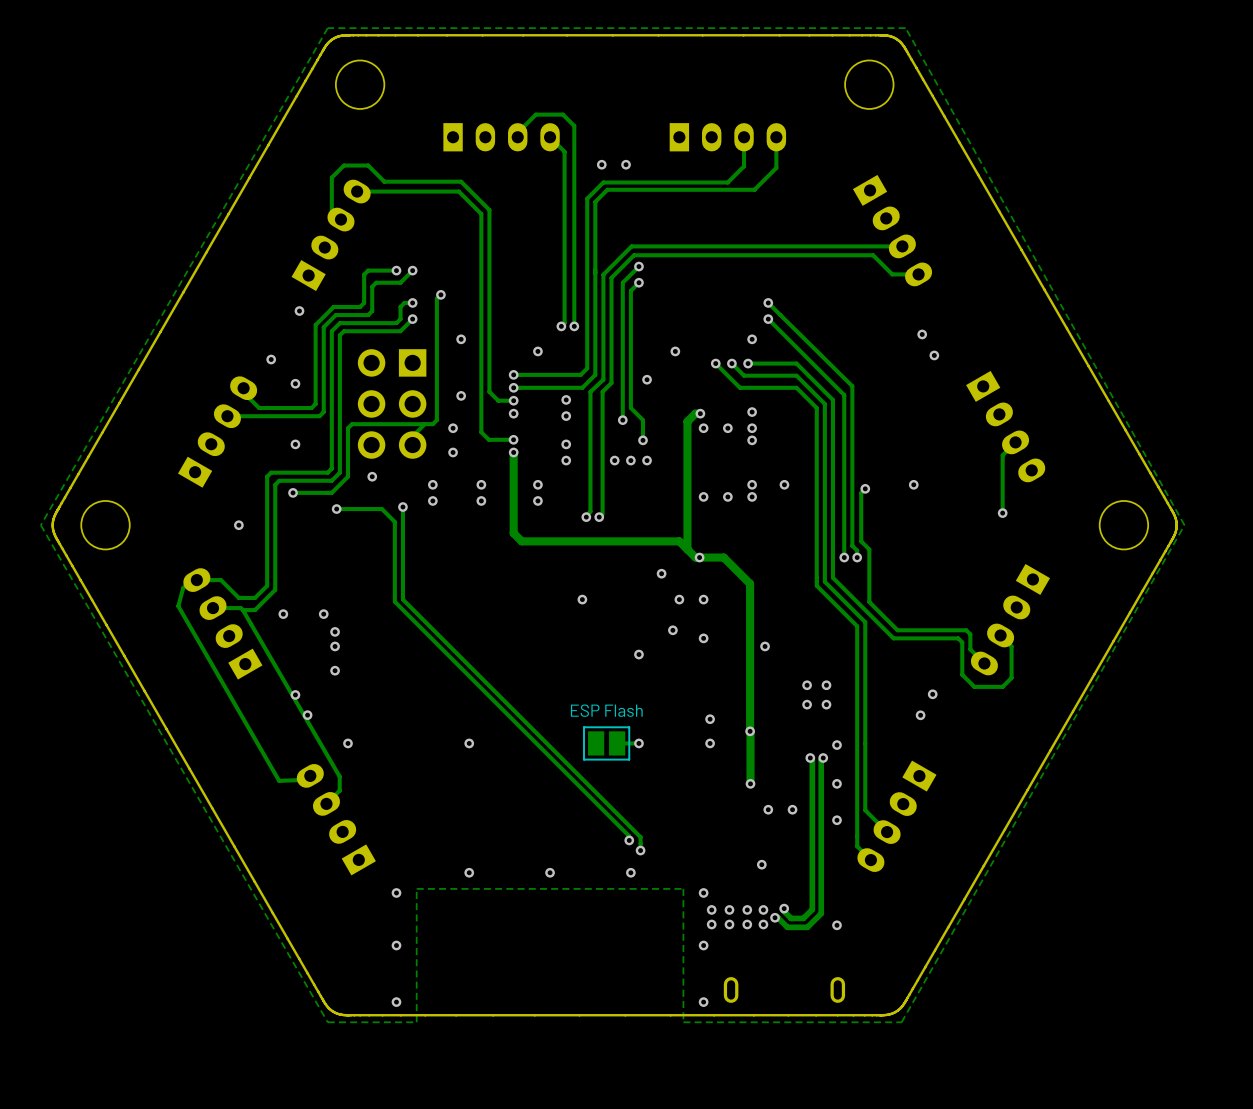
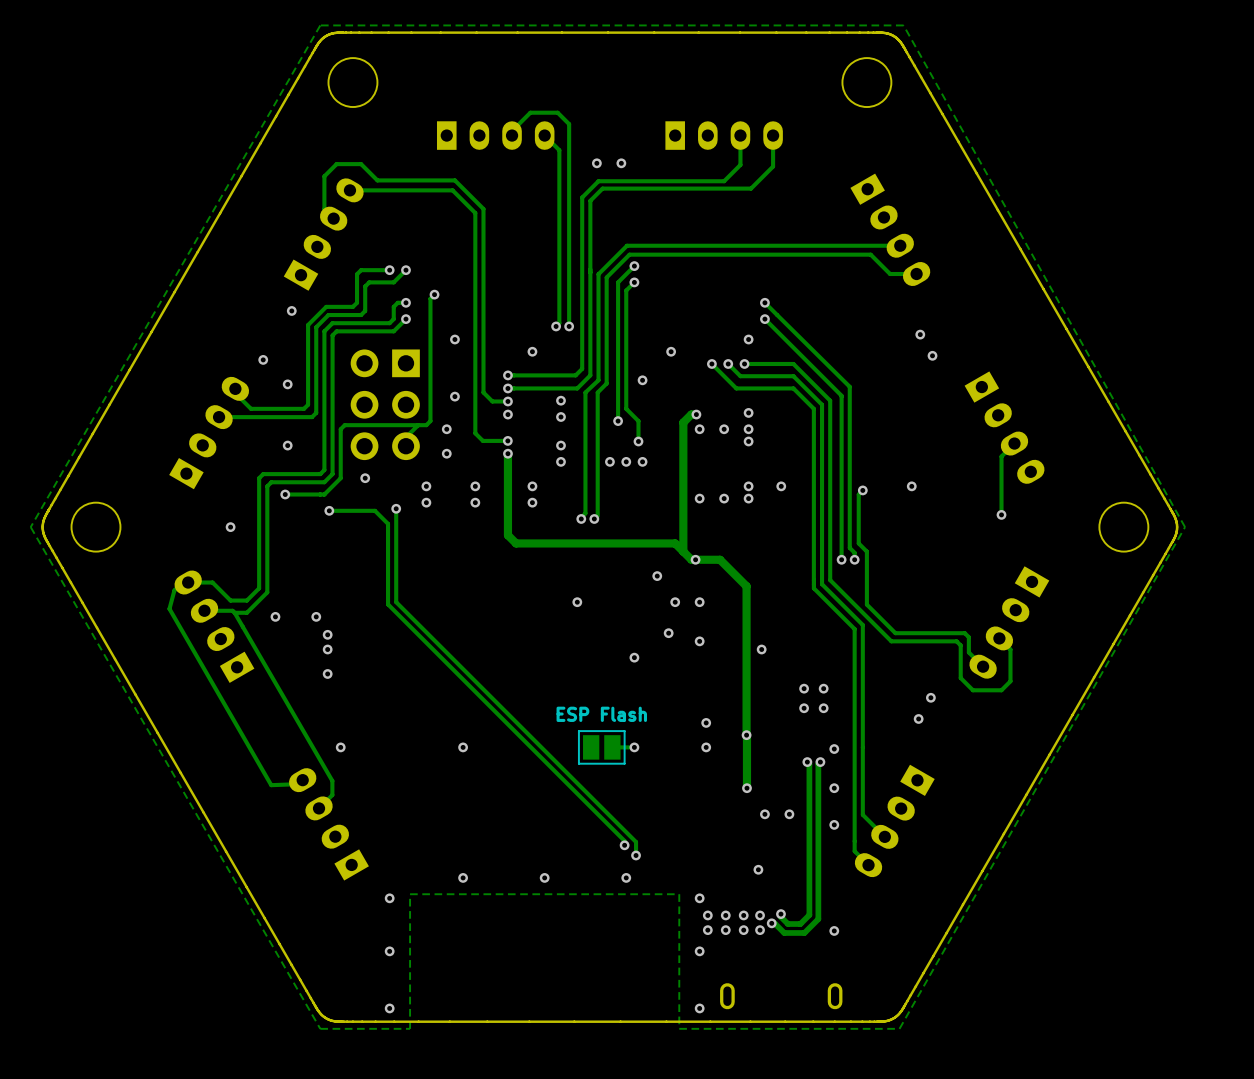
via: (295, 694) -> none
via: (307, 715) -> none

